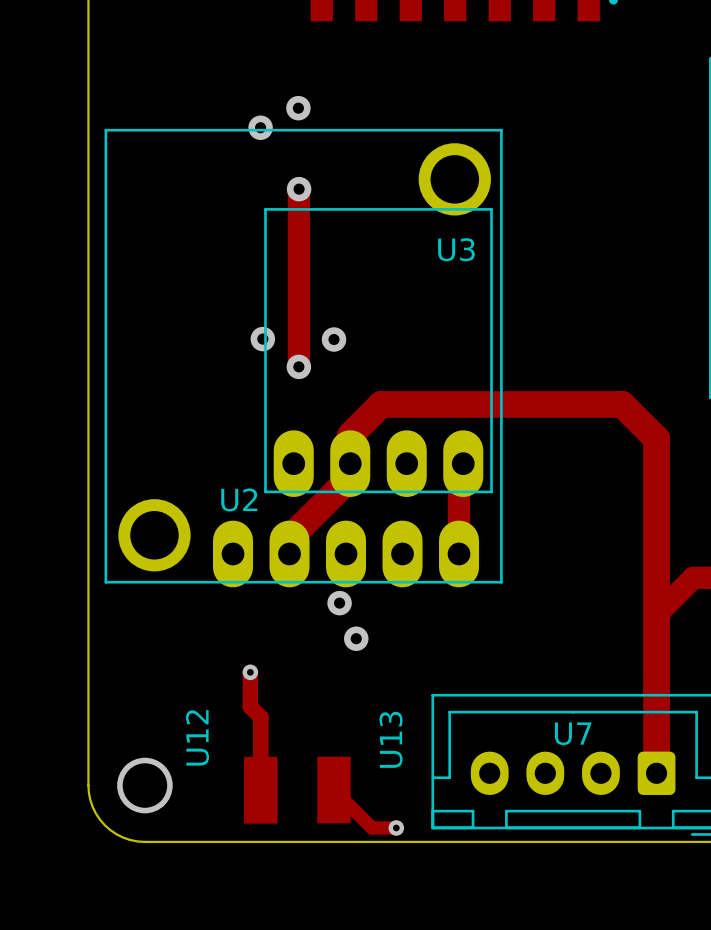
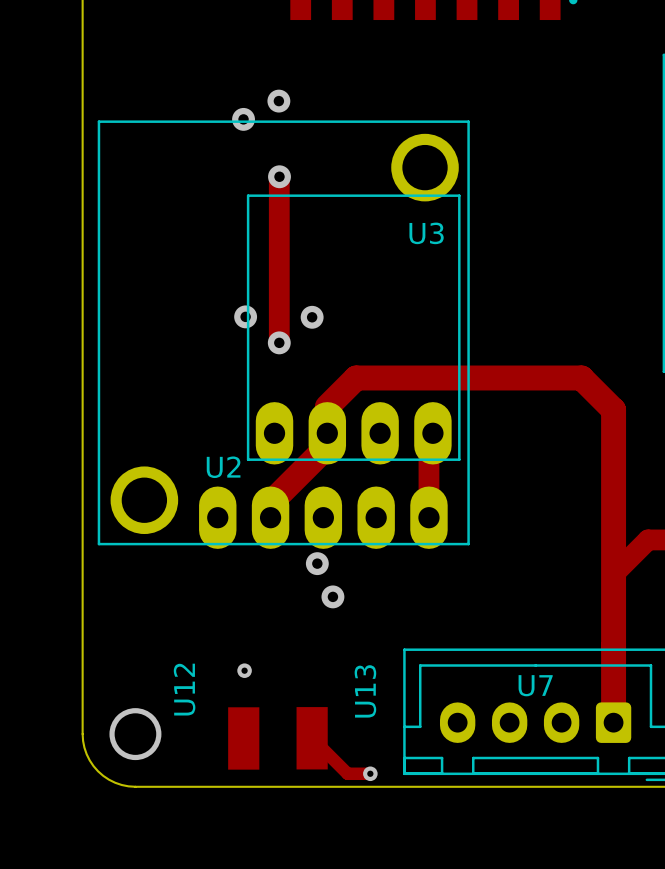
track: (250, 672) (250, 706) (260, 717) (260, 790) -> none
via position: (250, 672) -> (244, 670)

